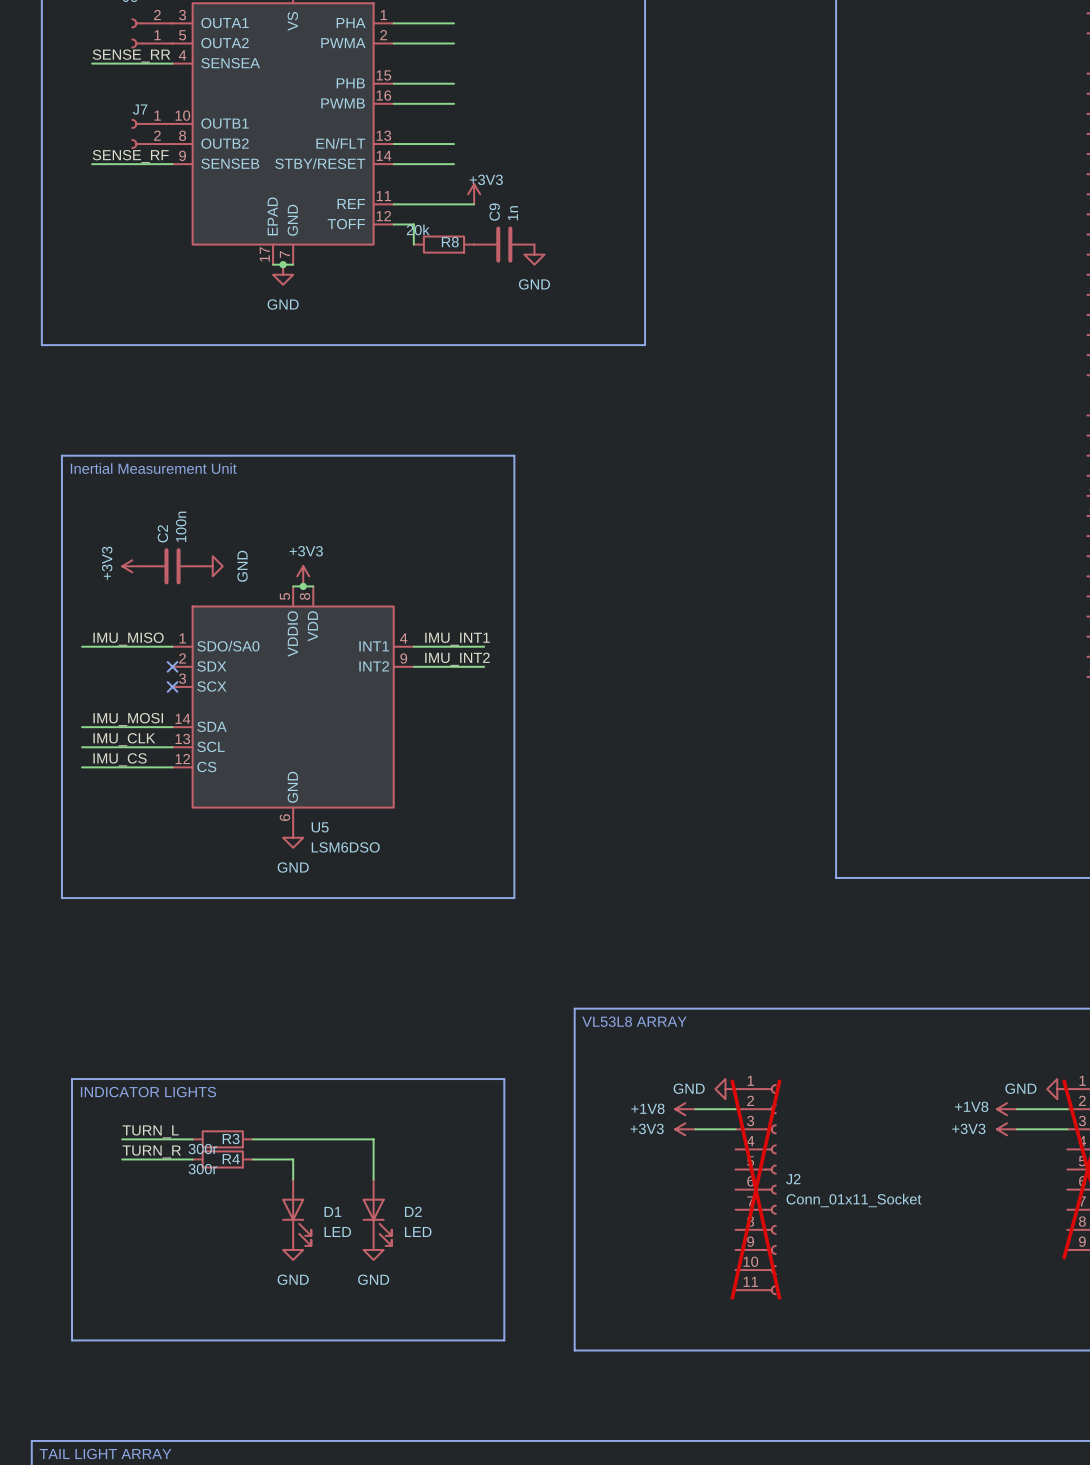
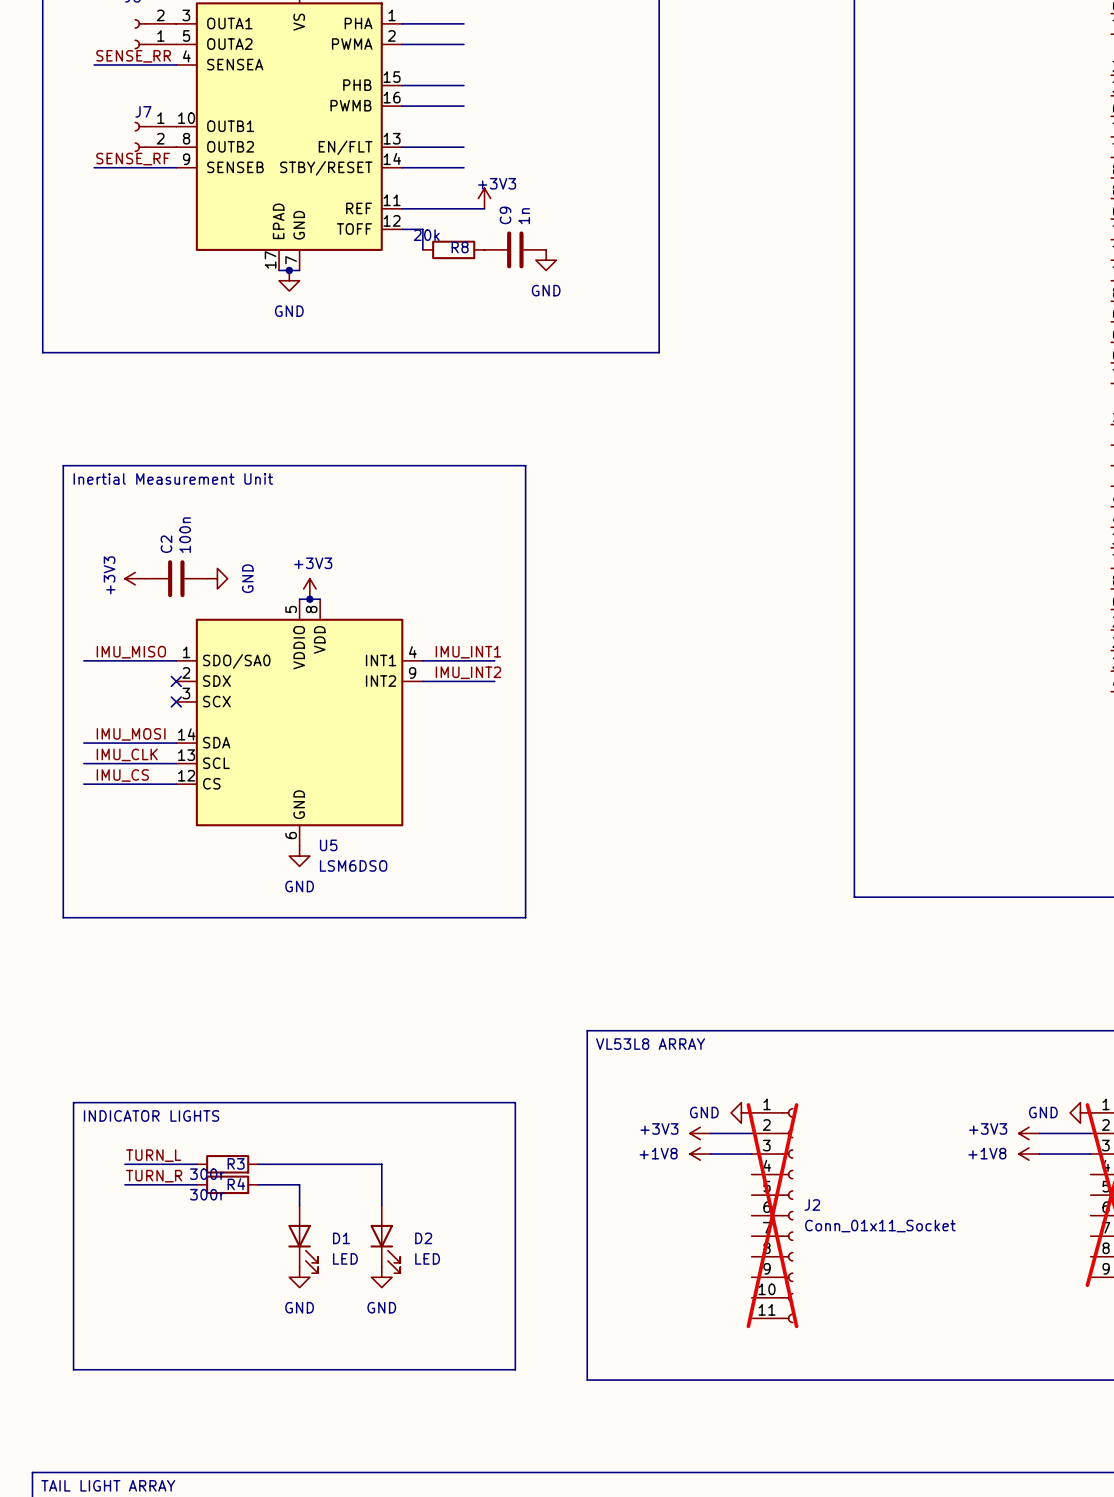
power symbol: +1V8 (685, 1109) -> +3V3 (700, 1133)
power symbol: +1V8 (1007, 1109) -> +3V3 (1029, 1133)
power symbol: +3V3 (685, 1129) -> +1V8 (700, 1154)
power symbol: +3V3 (1007, 1129) -> +1V8 (1029, 1154)

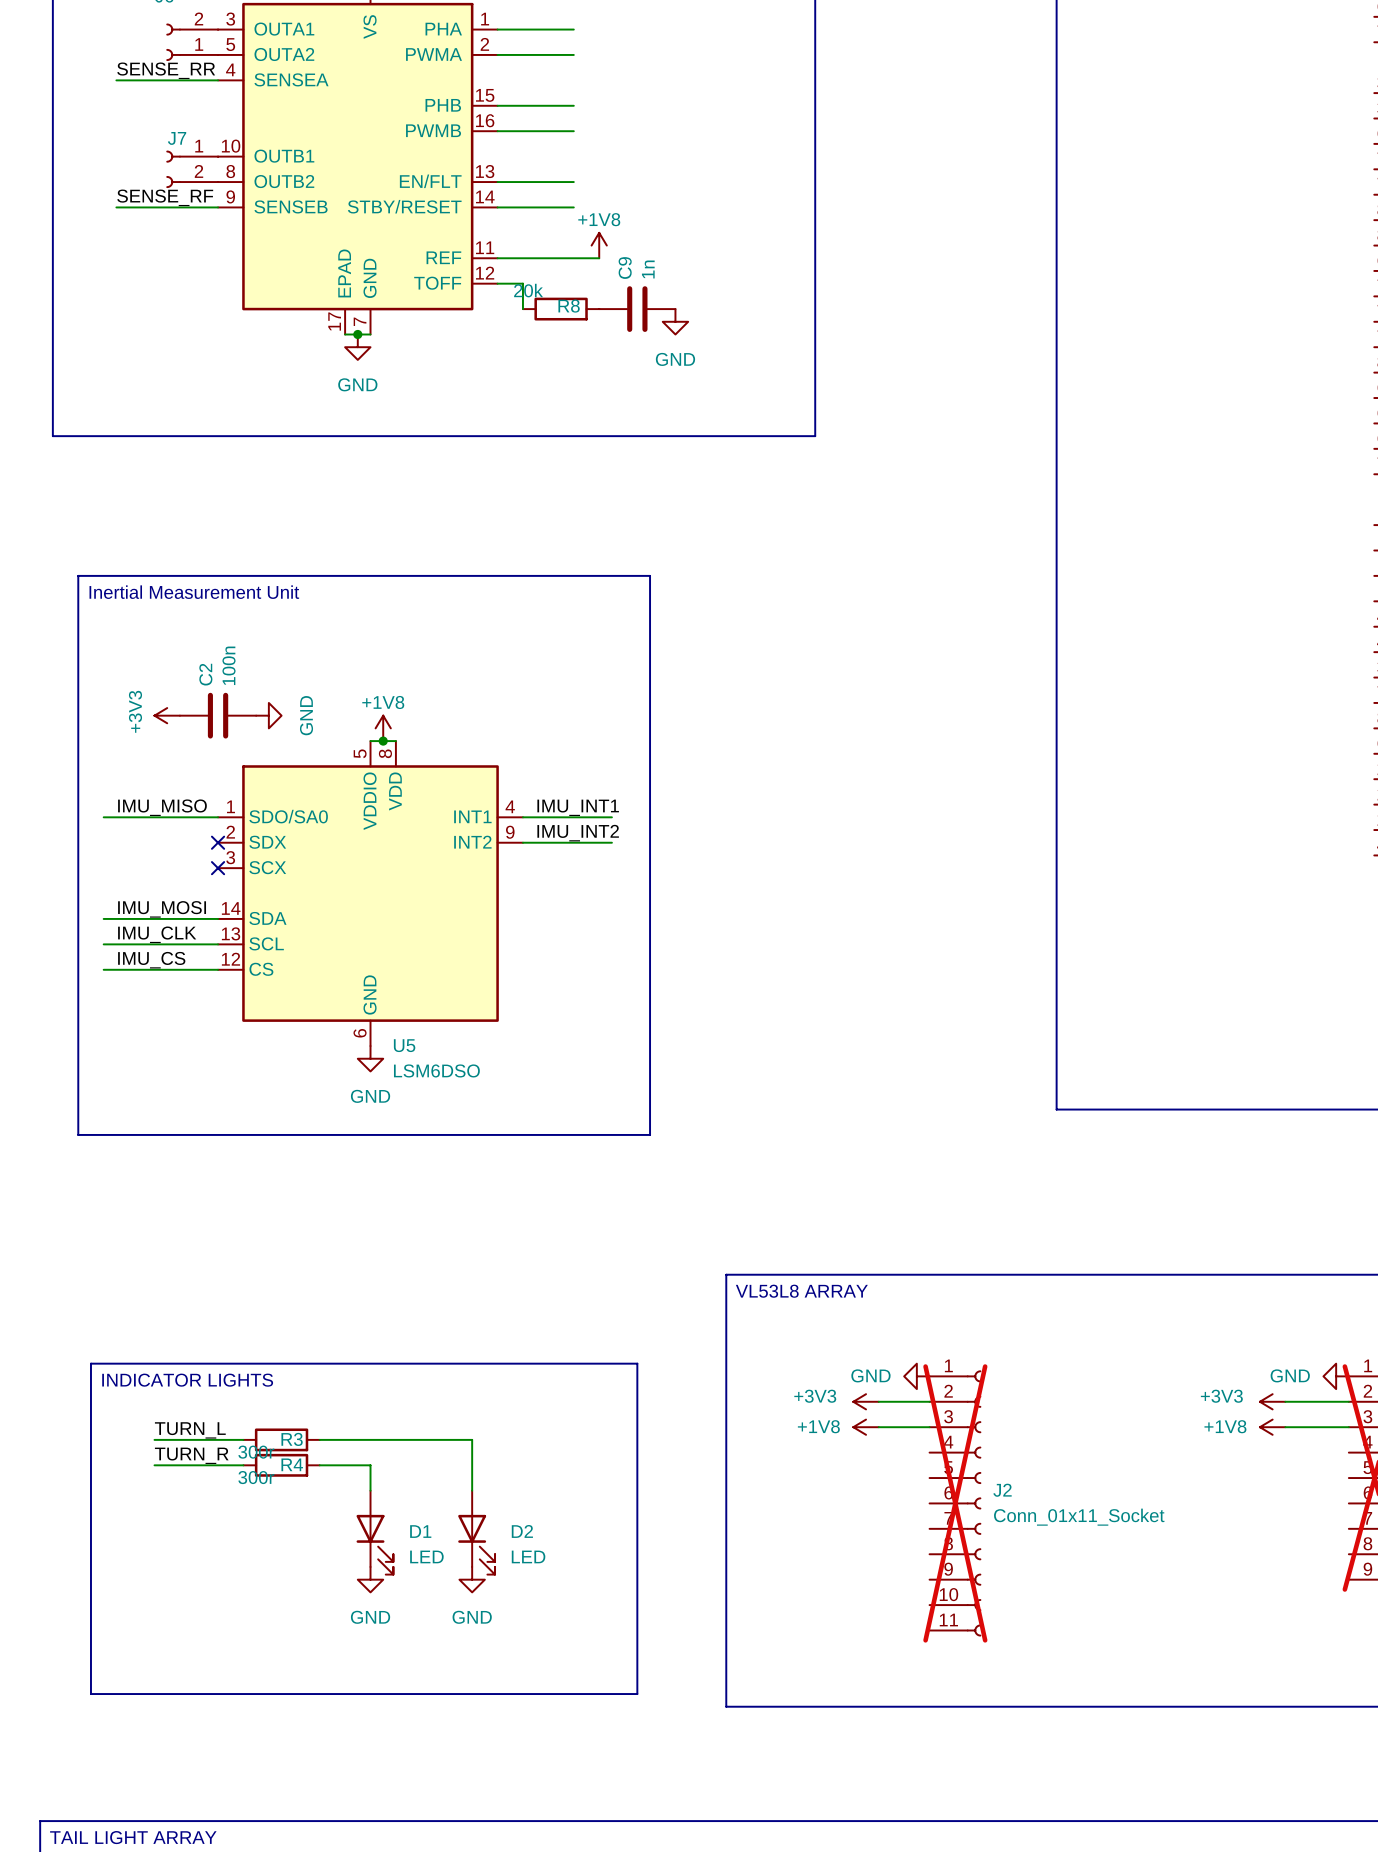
power symbol: +3V3 (484, 198) -> +1V8 (599, 245)
power symbol: +3V3 (309, 588) -> +1V8 (383, 728)

